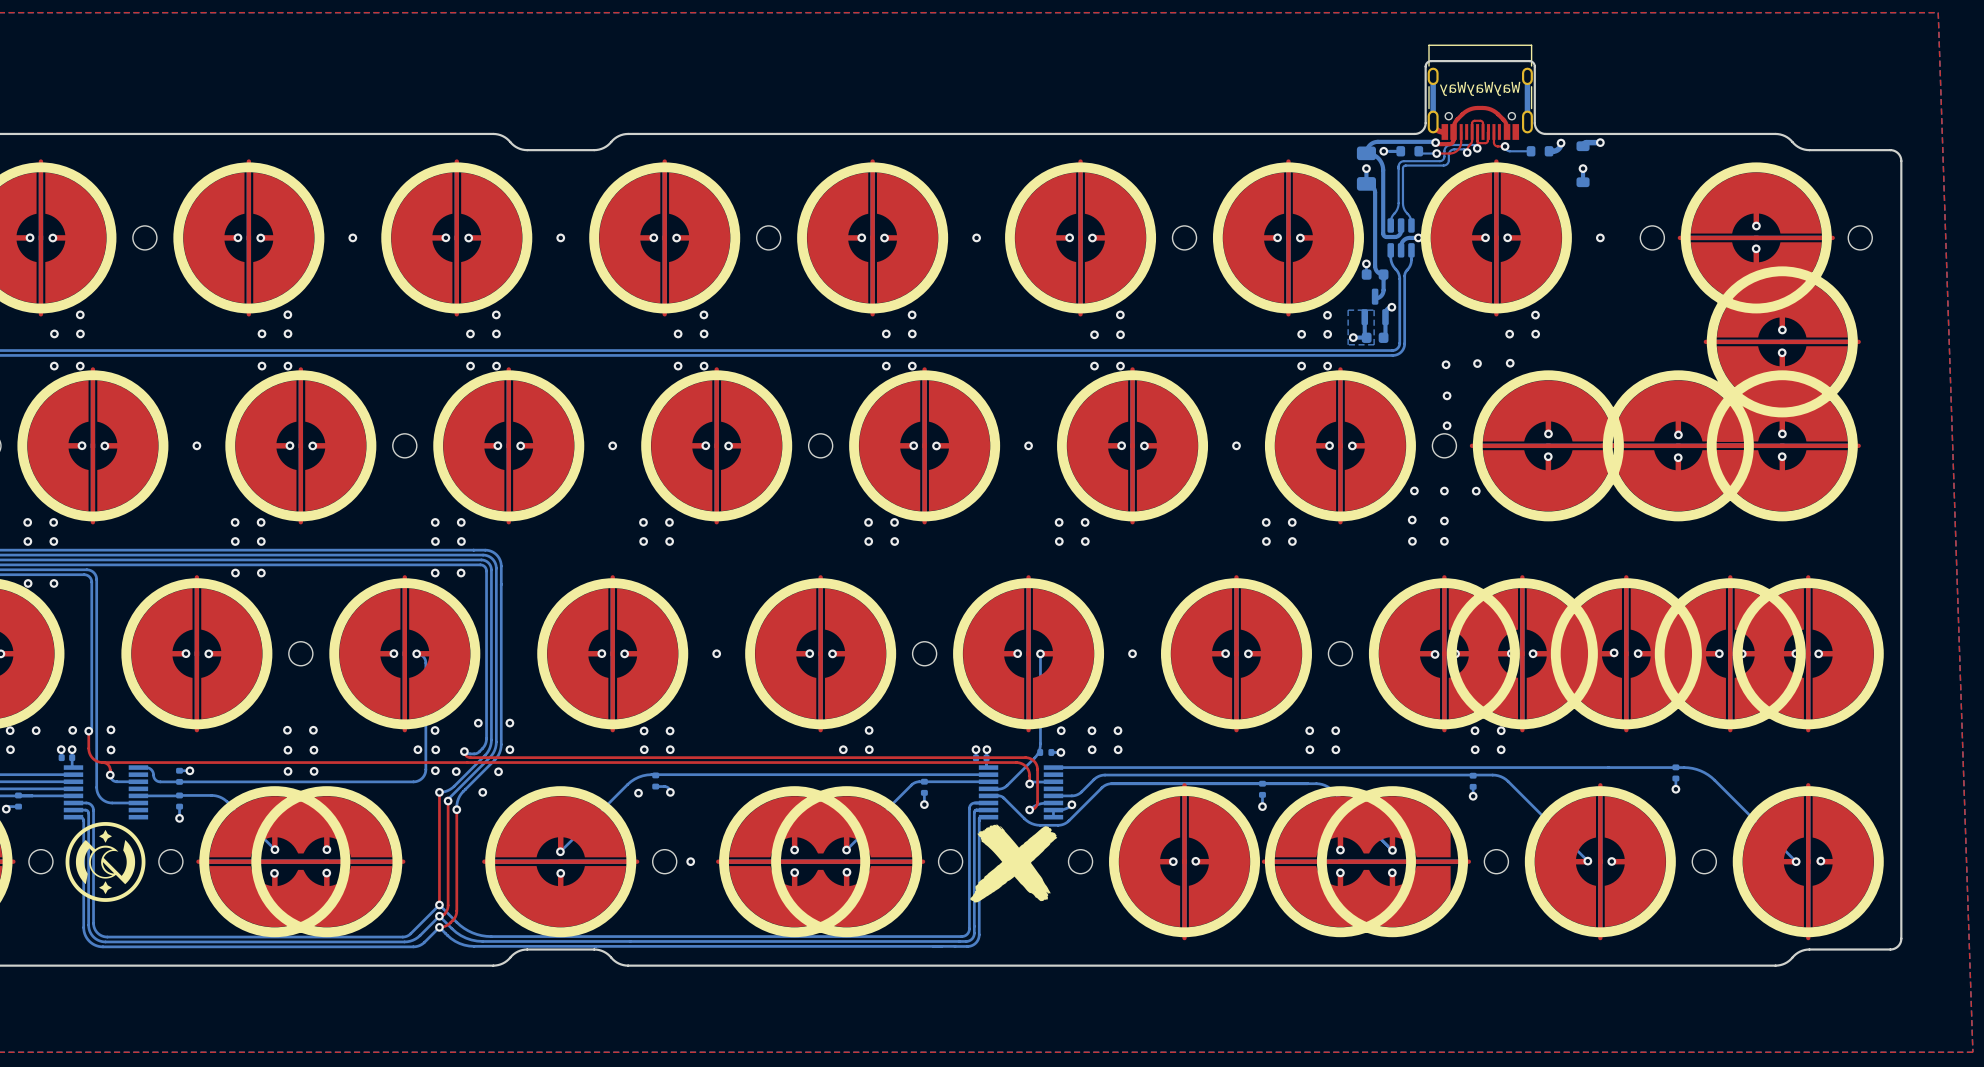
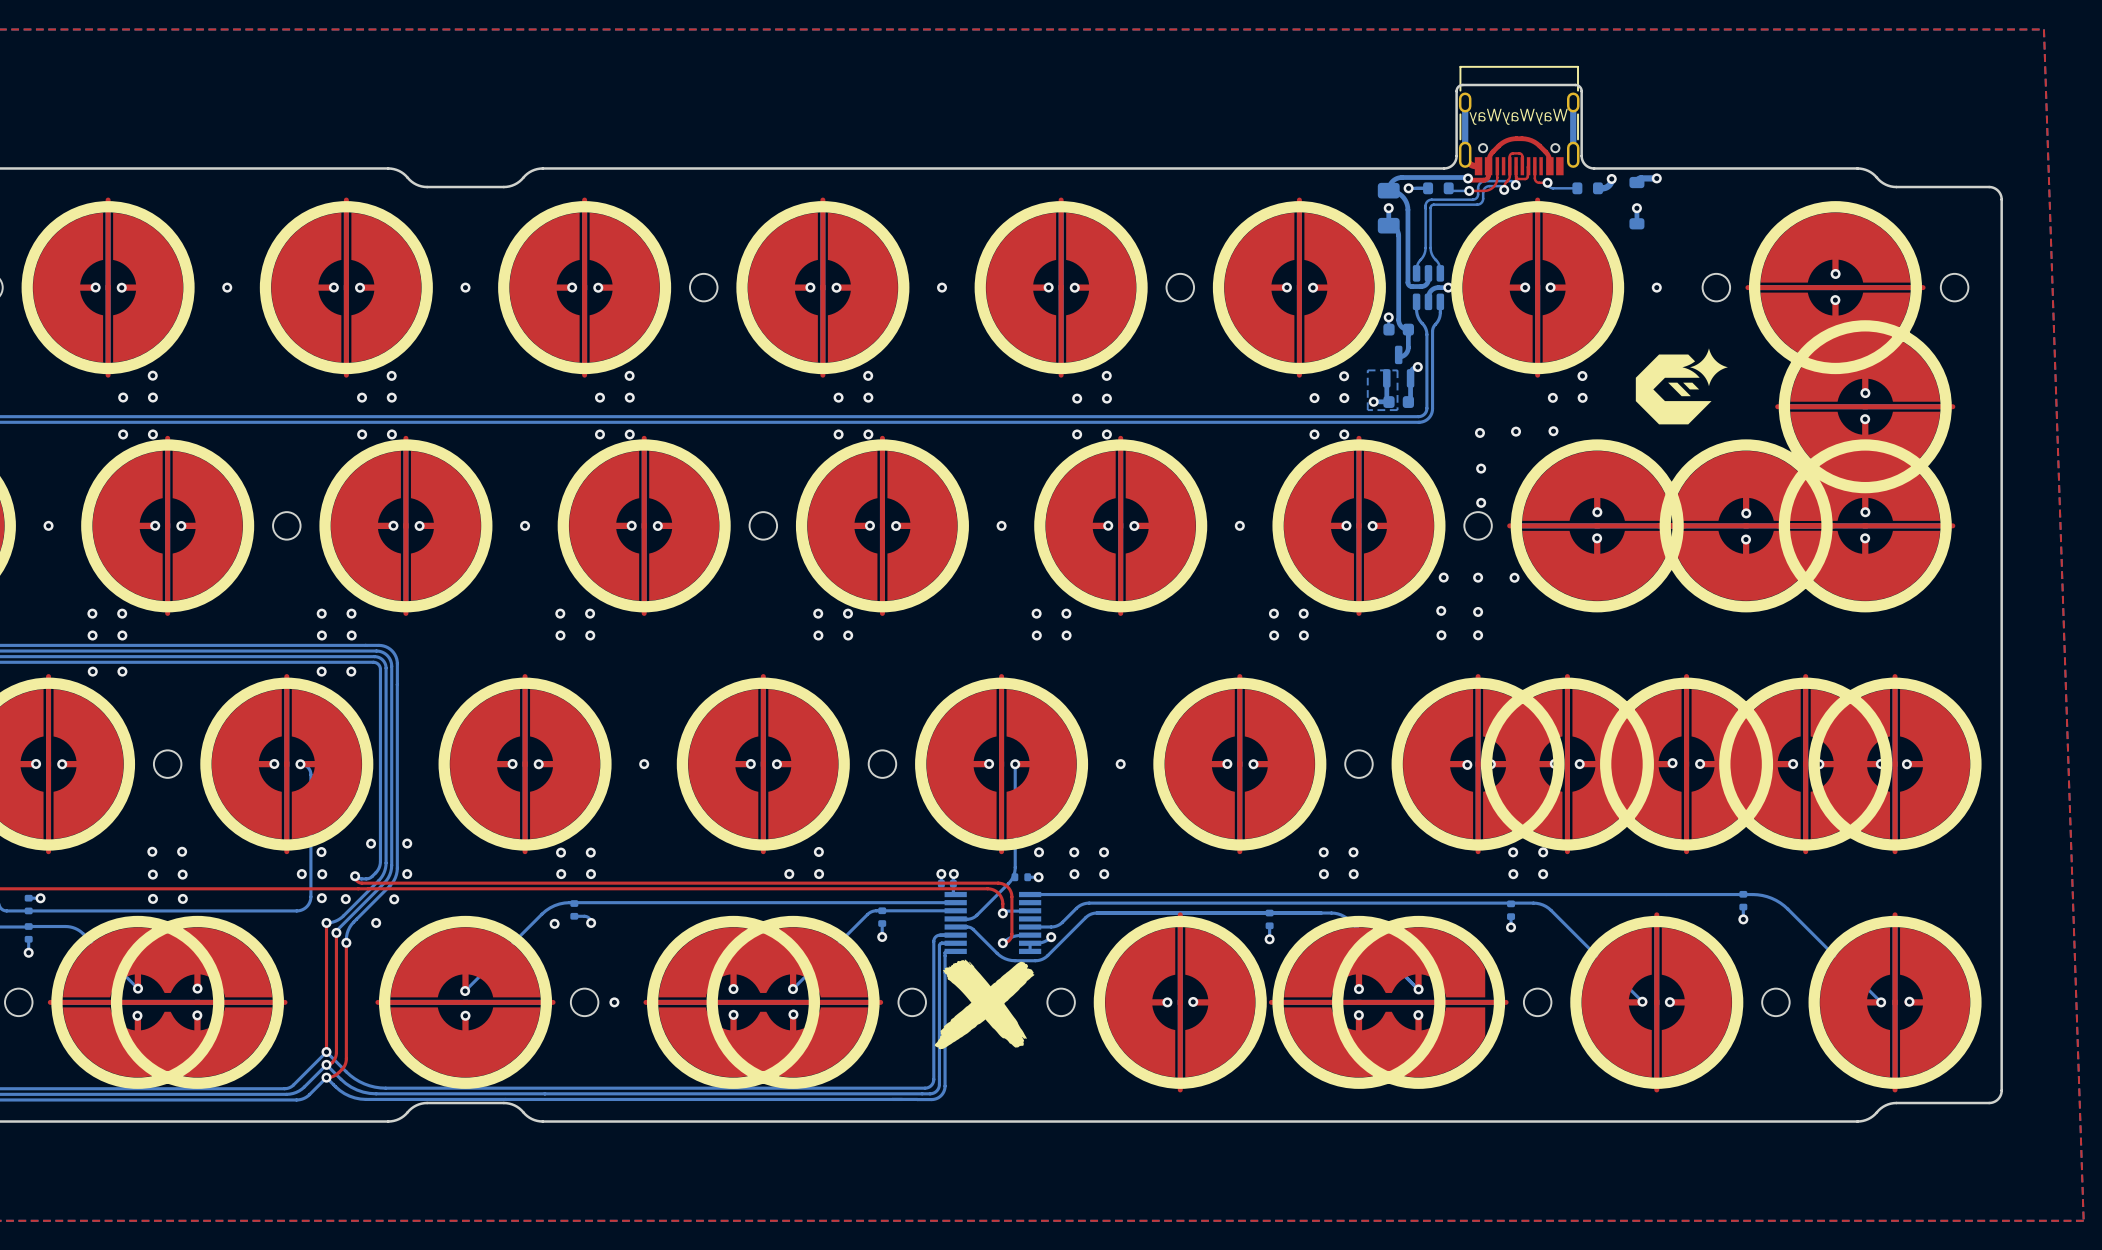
drawing: none -> [1635, 348, 1728, 425]

